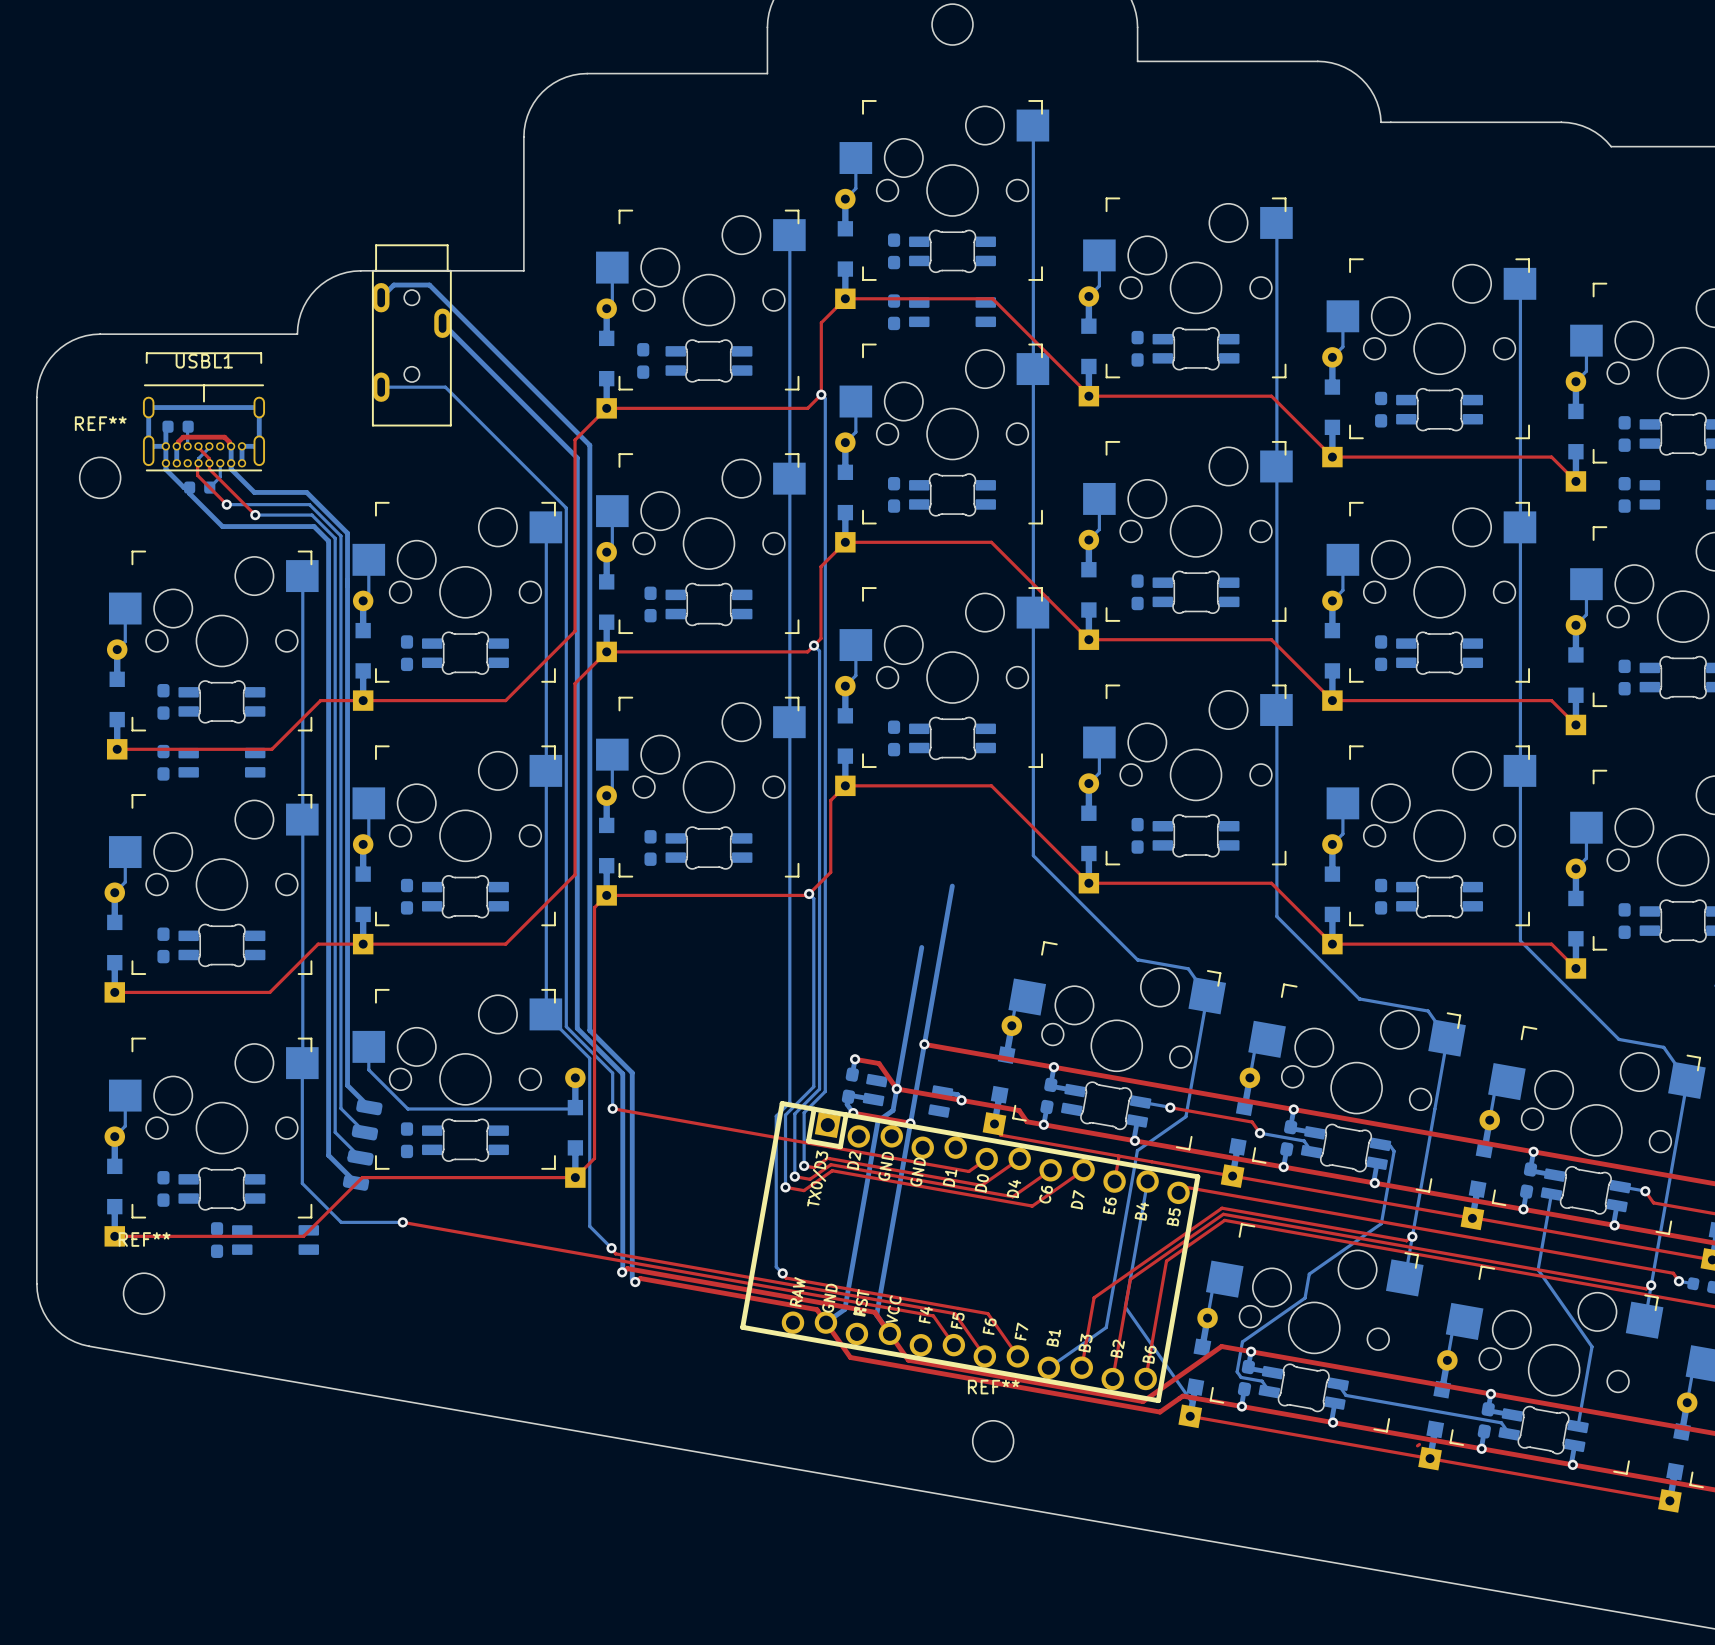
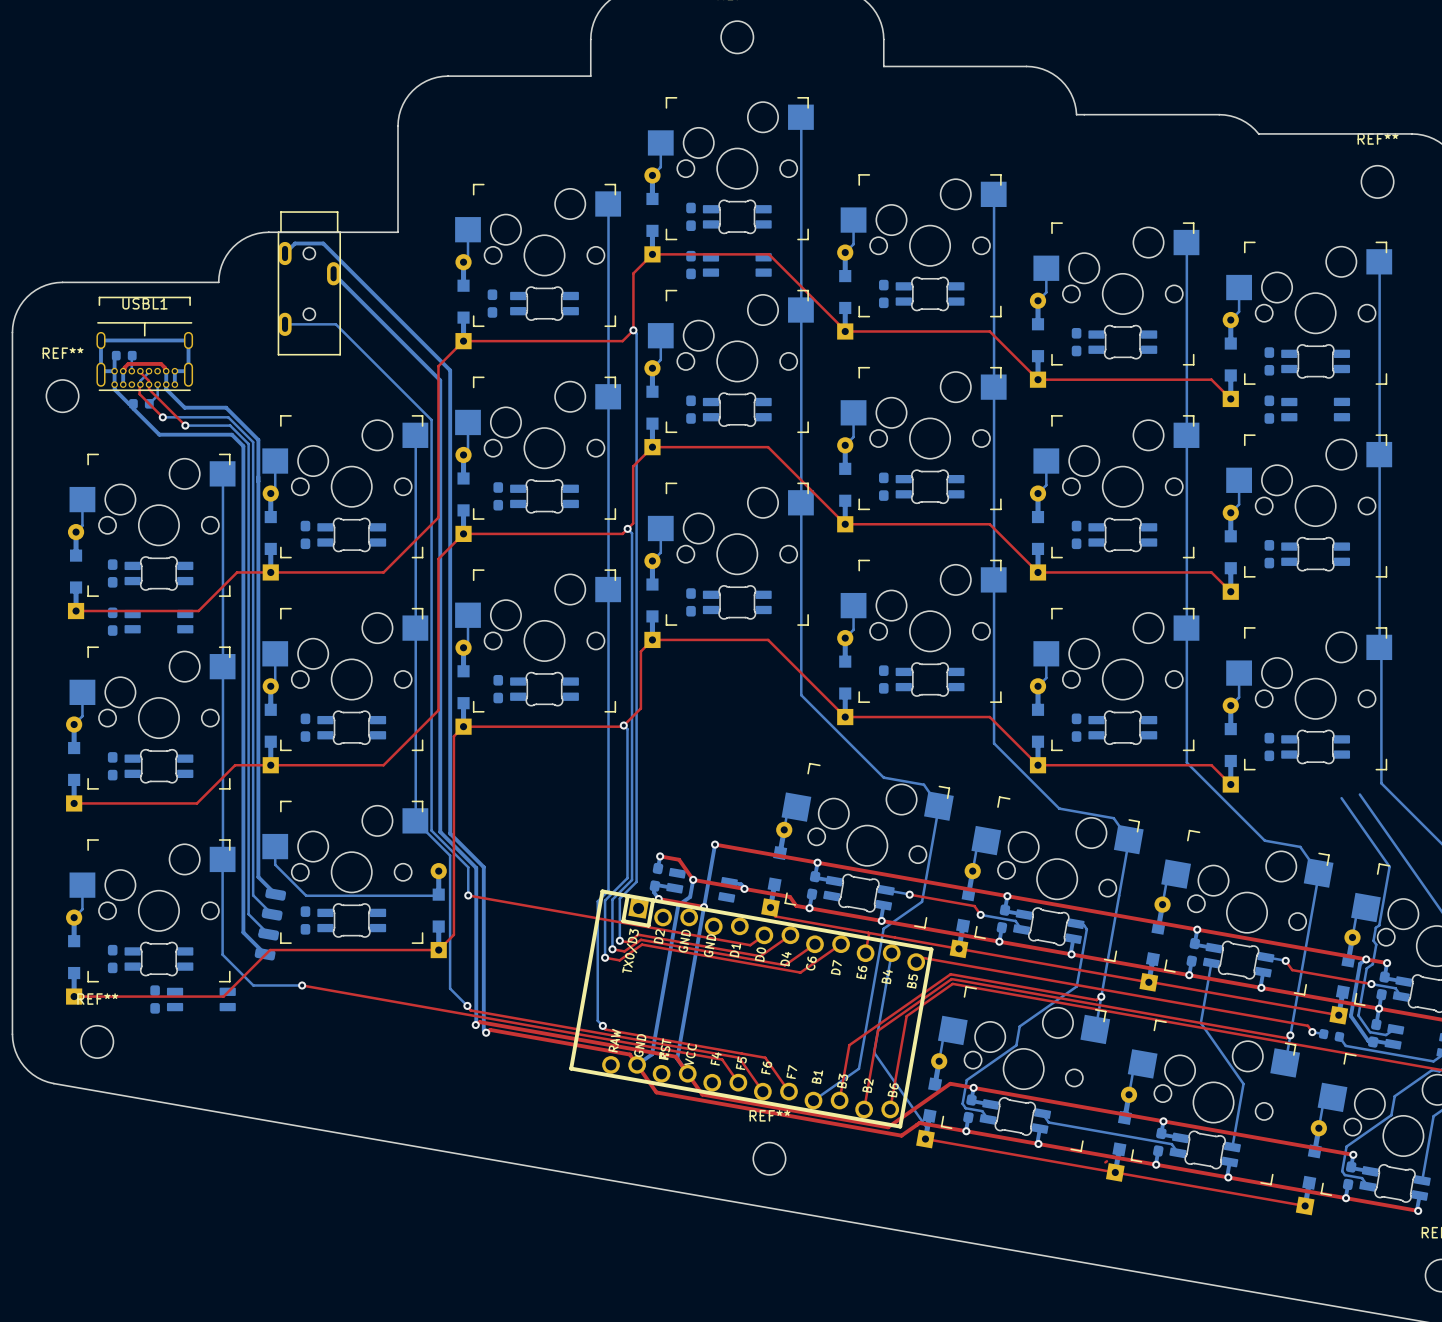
bottom track: (952, 886) (924, 1044) -> none
bottom track: (921, 947) (896, 1088) -> none

